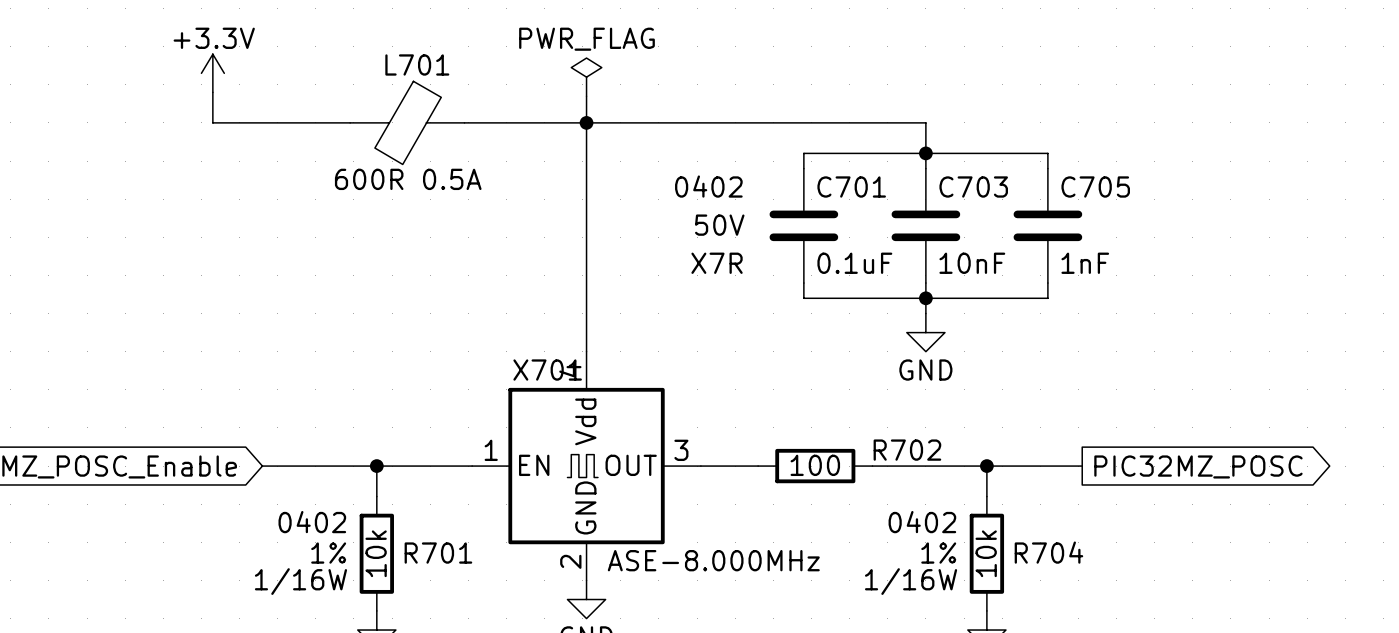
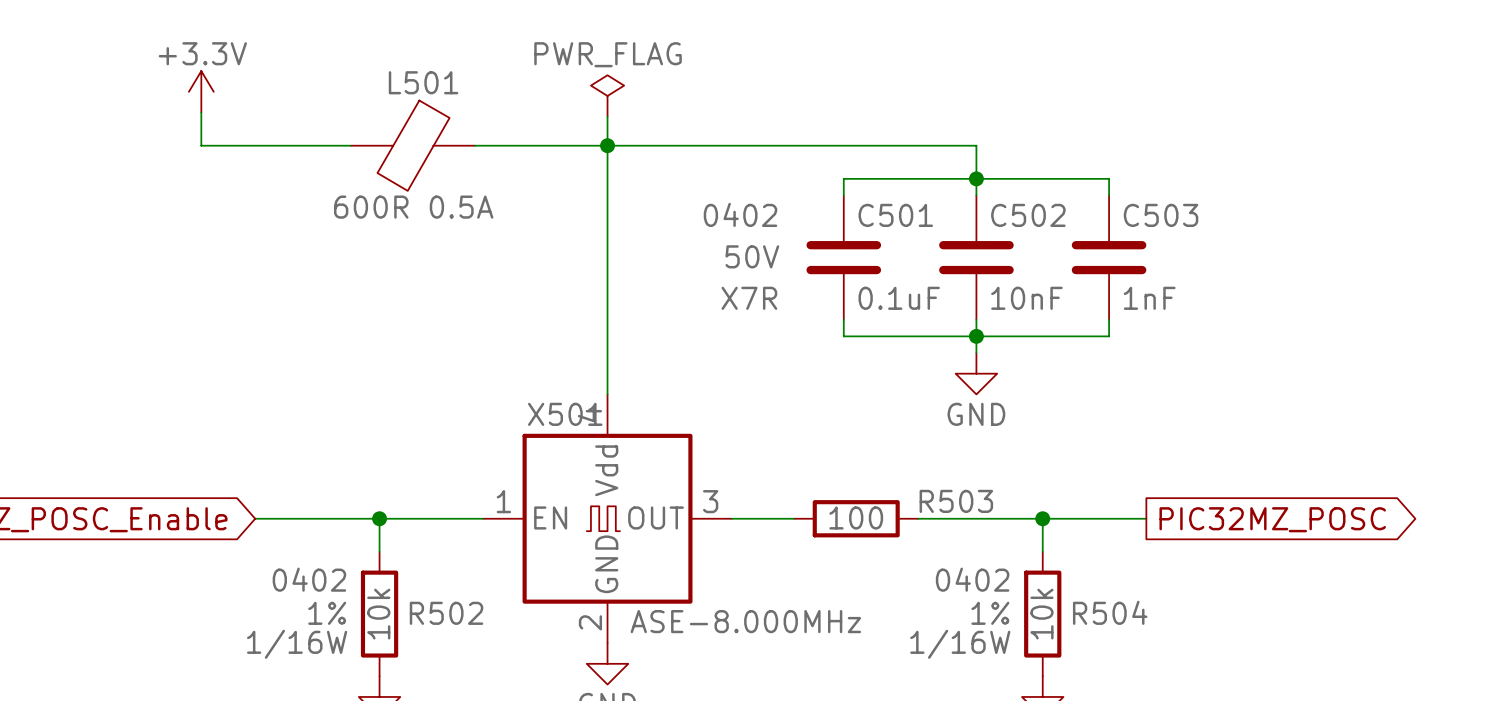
L701 name: L701 (417, 64) -> L501 (423, 82)
C701 name: C701 (851, 187) -> C501 (895, 215)
C703 name: C703 (973, 187) -> C502 (1028, 215)
C705 name: C705 (1095, 187) -> C503 (1161, 215)
X701 name: X701 (547, 370) -> X501 (565, 414)
R702 name: R702 (907, 450) -> R503 (956, 501)
R704 name: R704 (1048, 552) -> R504 (1110, 612)
R701 name: R701 (438, 553) -> R502 (446, 613)

